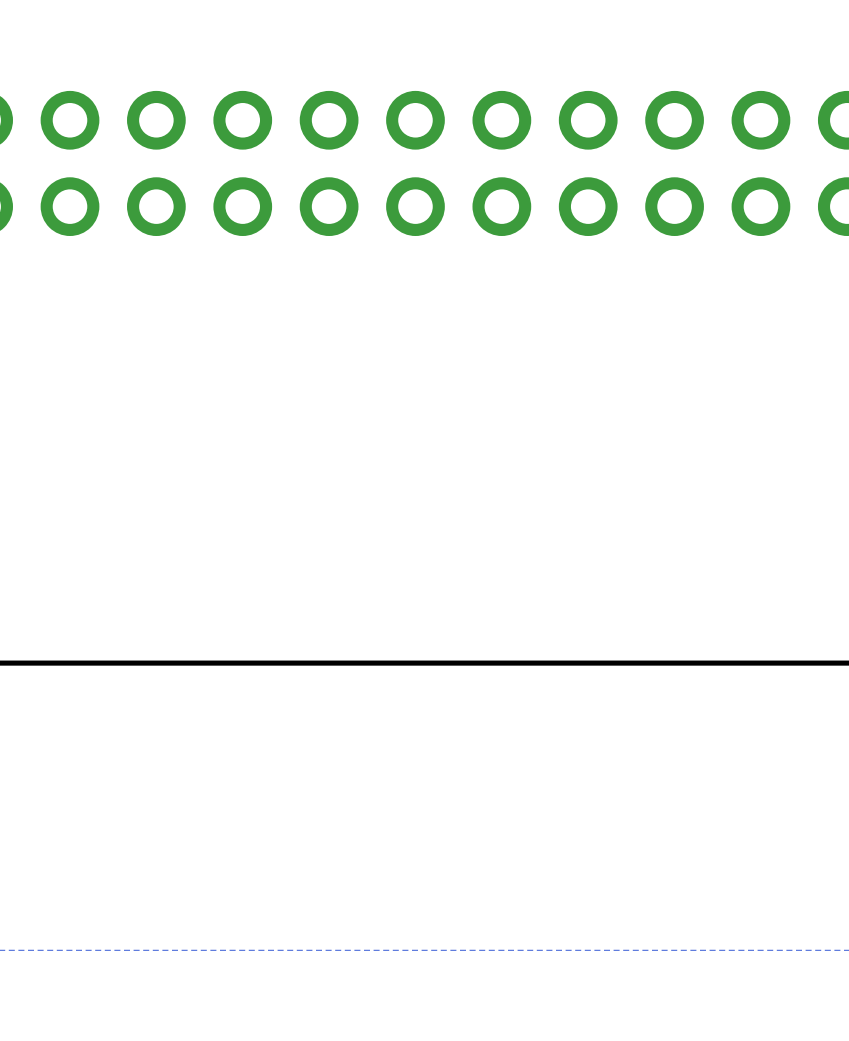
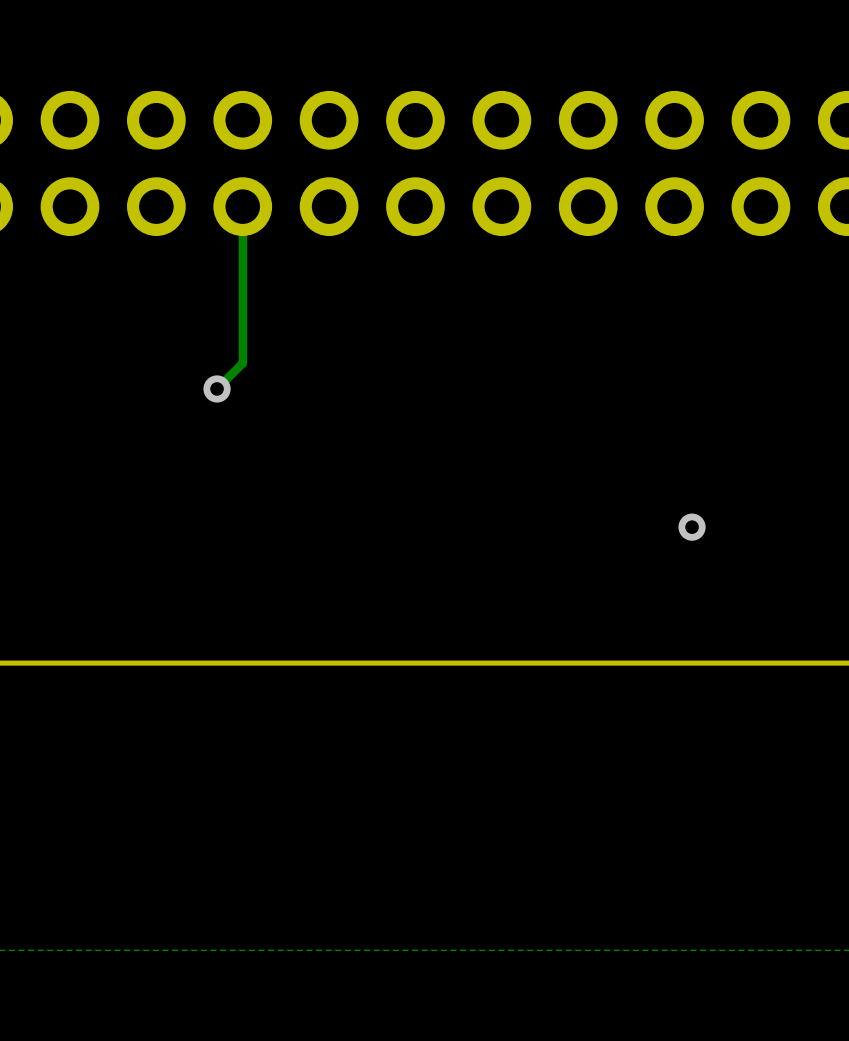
track: none -> (243, 206) (242, 363) (217, 388)
via: none -> (217, 388)
via: none -> (692, 527)

